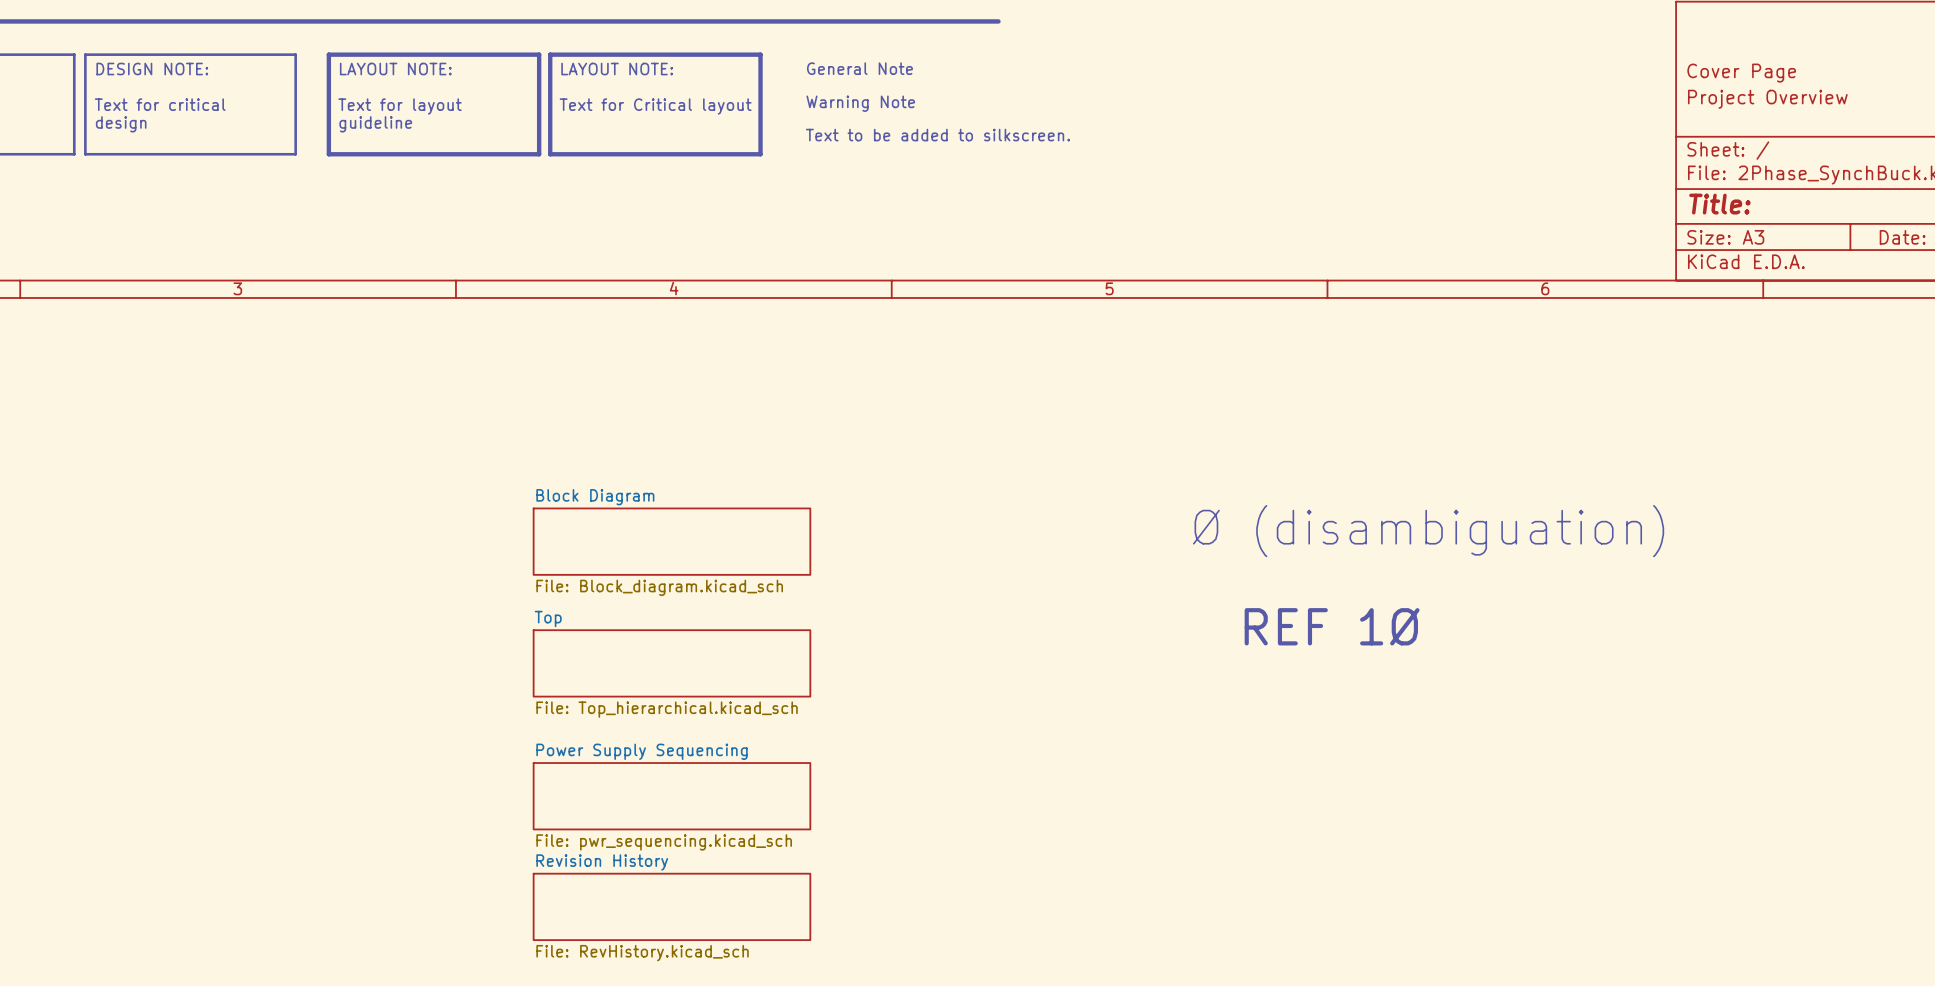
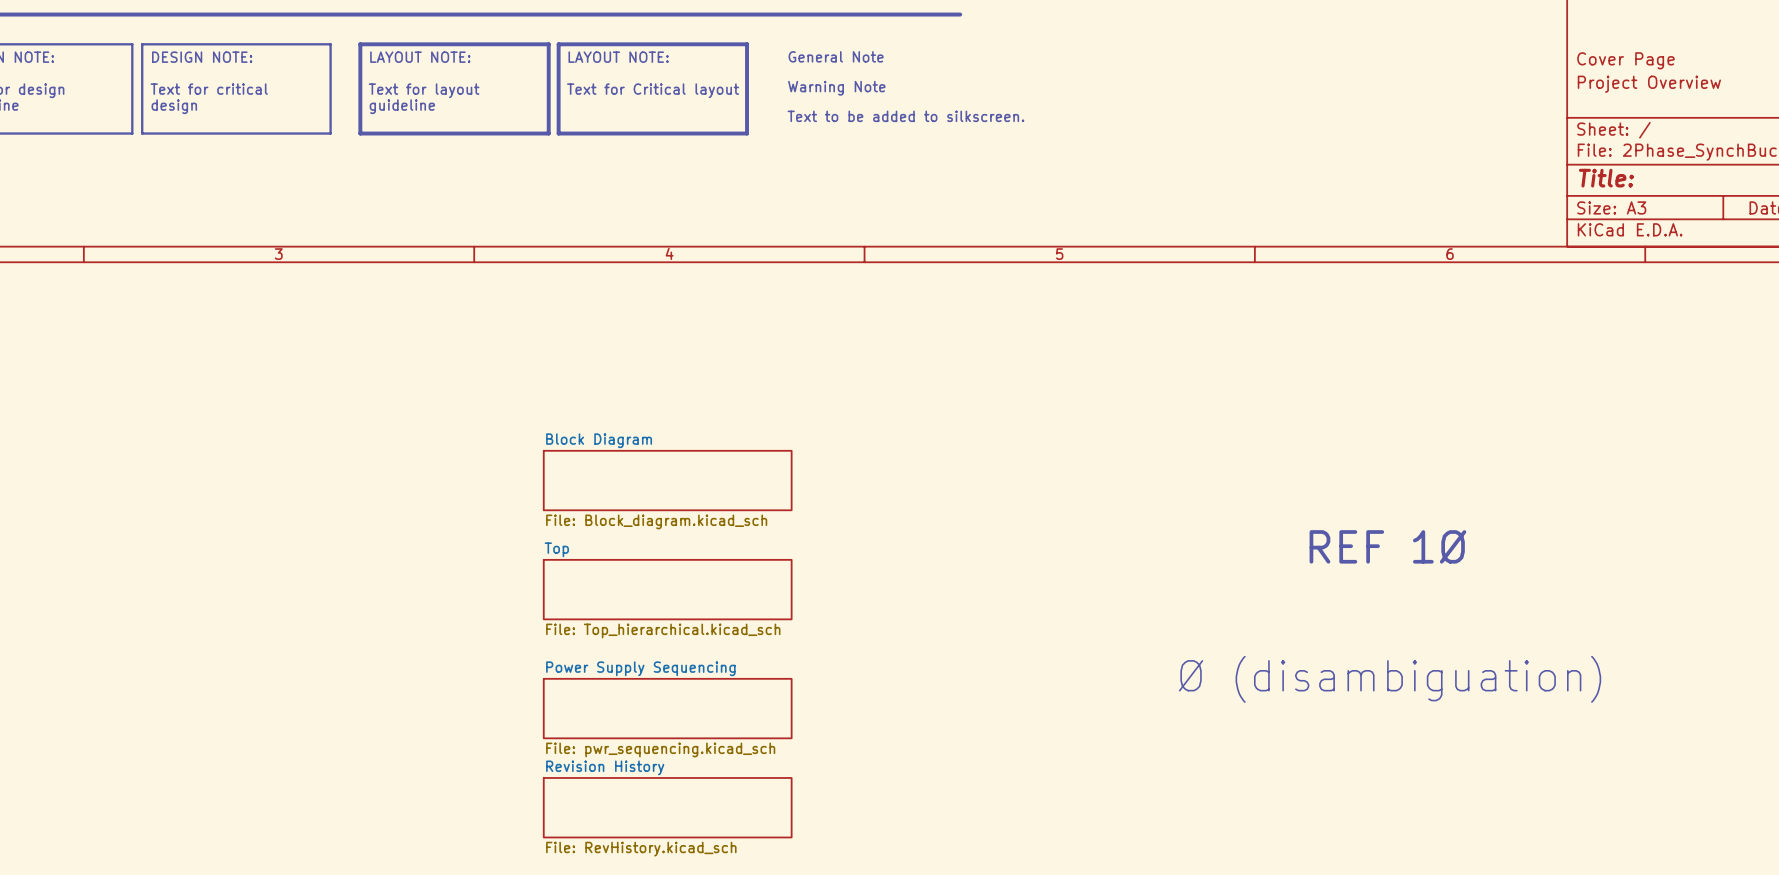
text: Ø (disambiguation) (1428, 531) -> none
text position: REF 1Ø (1332, 626) -> REF 1Ø (1387, 546)
text: none -> Ø (disambiguation) (1390, 679)

